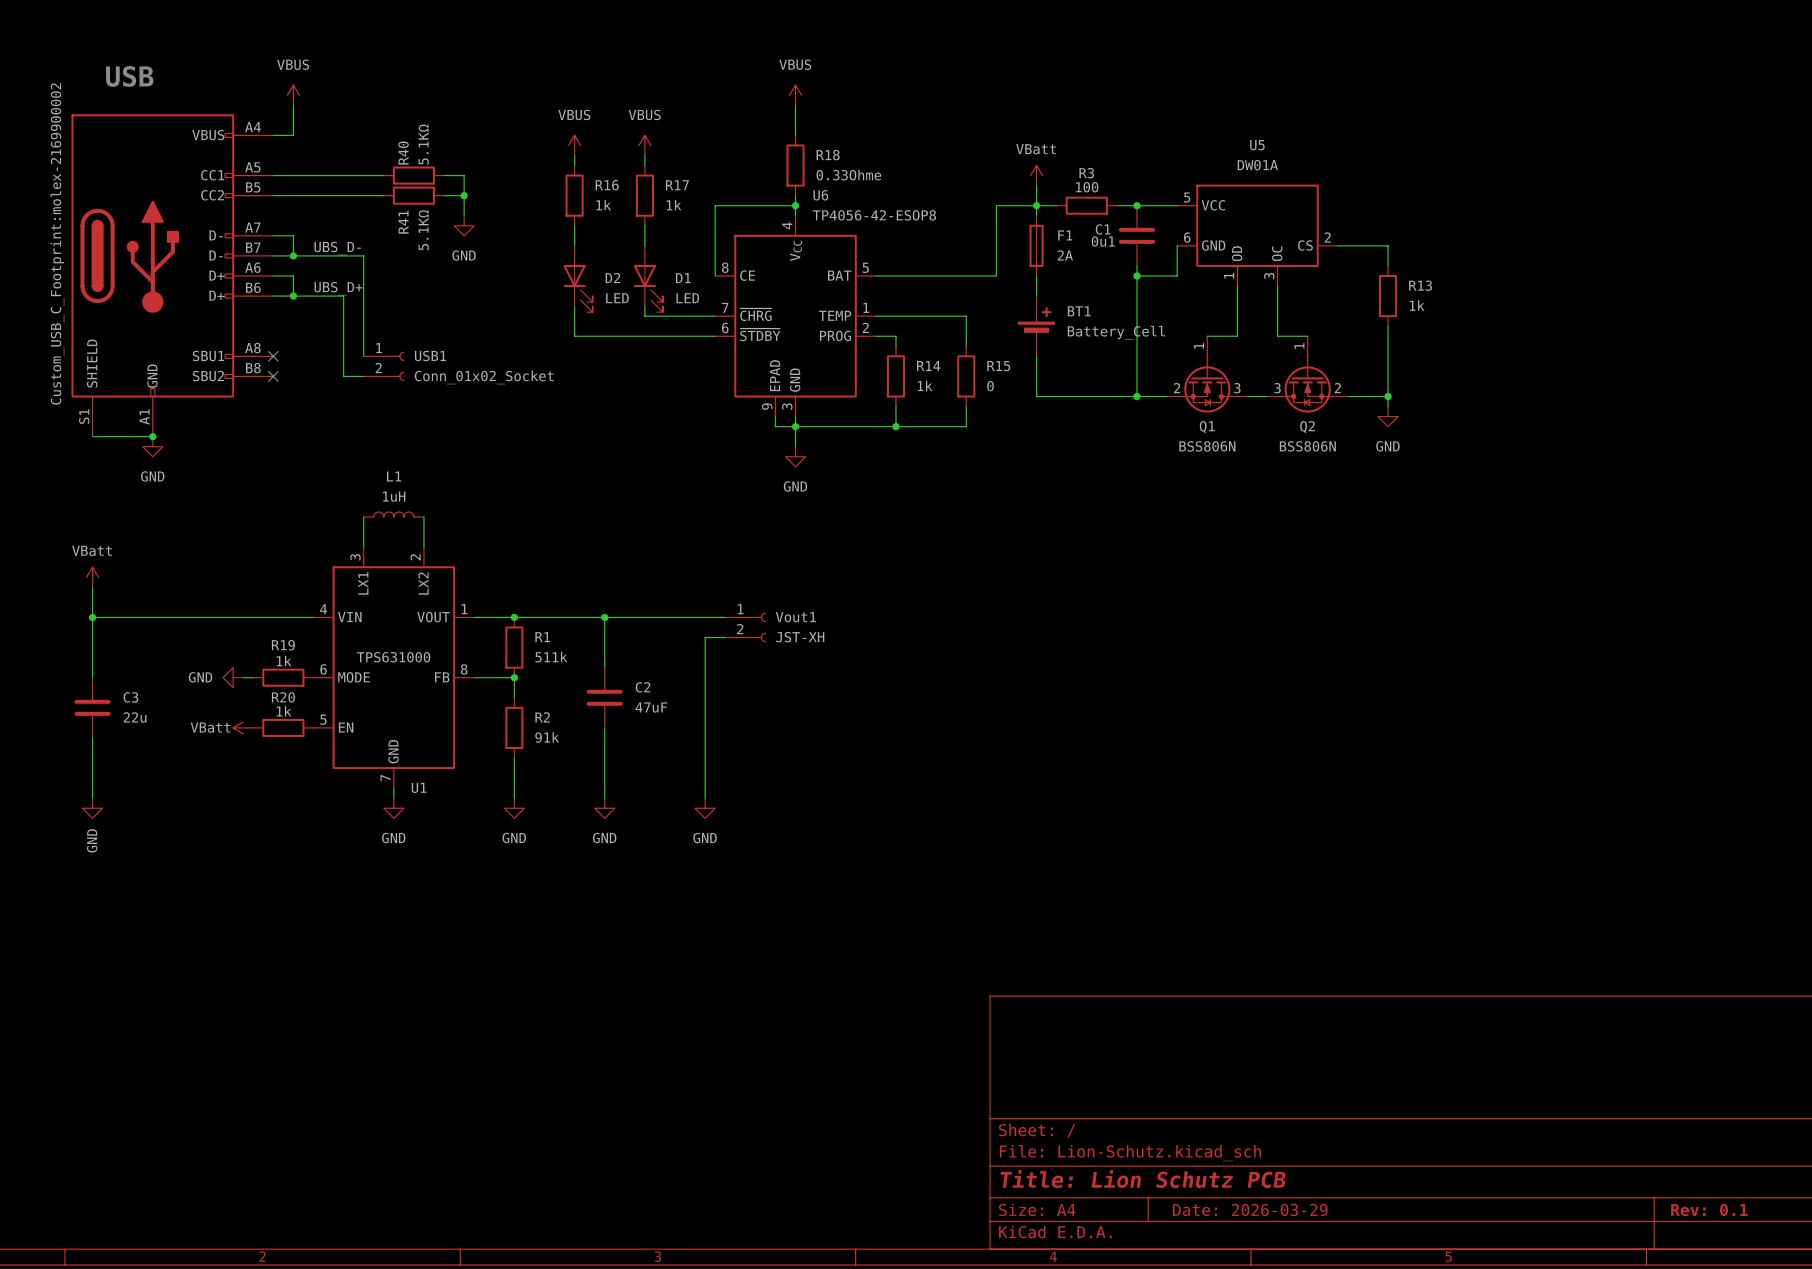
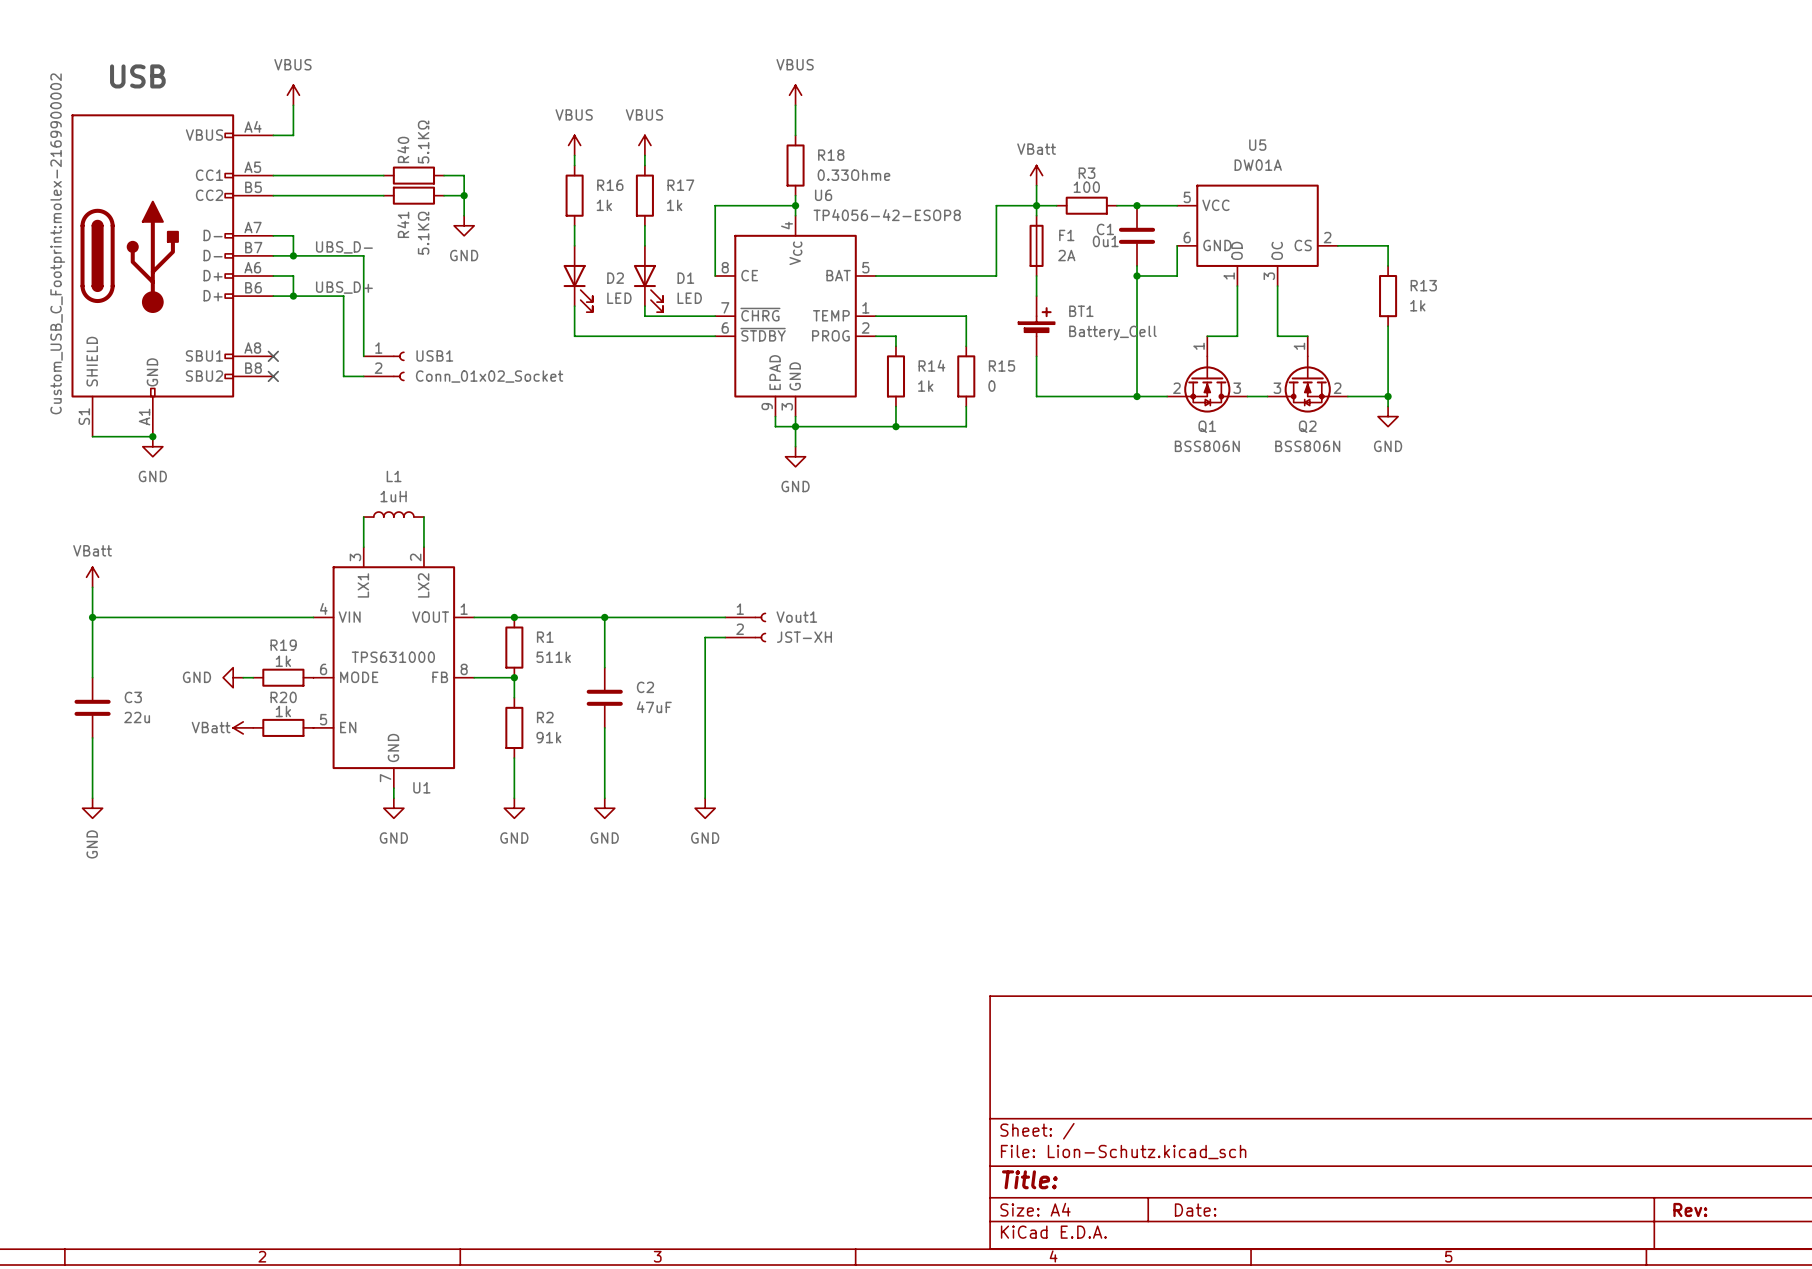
title block: Title: Lion Schutz PCB (1143, 1179) -> Title: (1029, 1179)
title block: Date: 2026-03-29 (1250, 1210) -> Date: (1195, 1209)
title block: Rev: 0.1 (1709, 1210) -> Rev: (1690, 1209)

